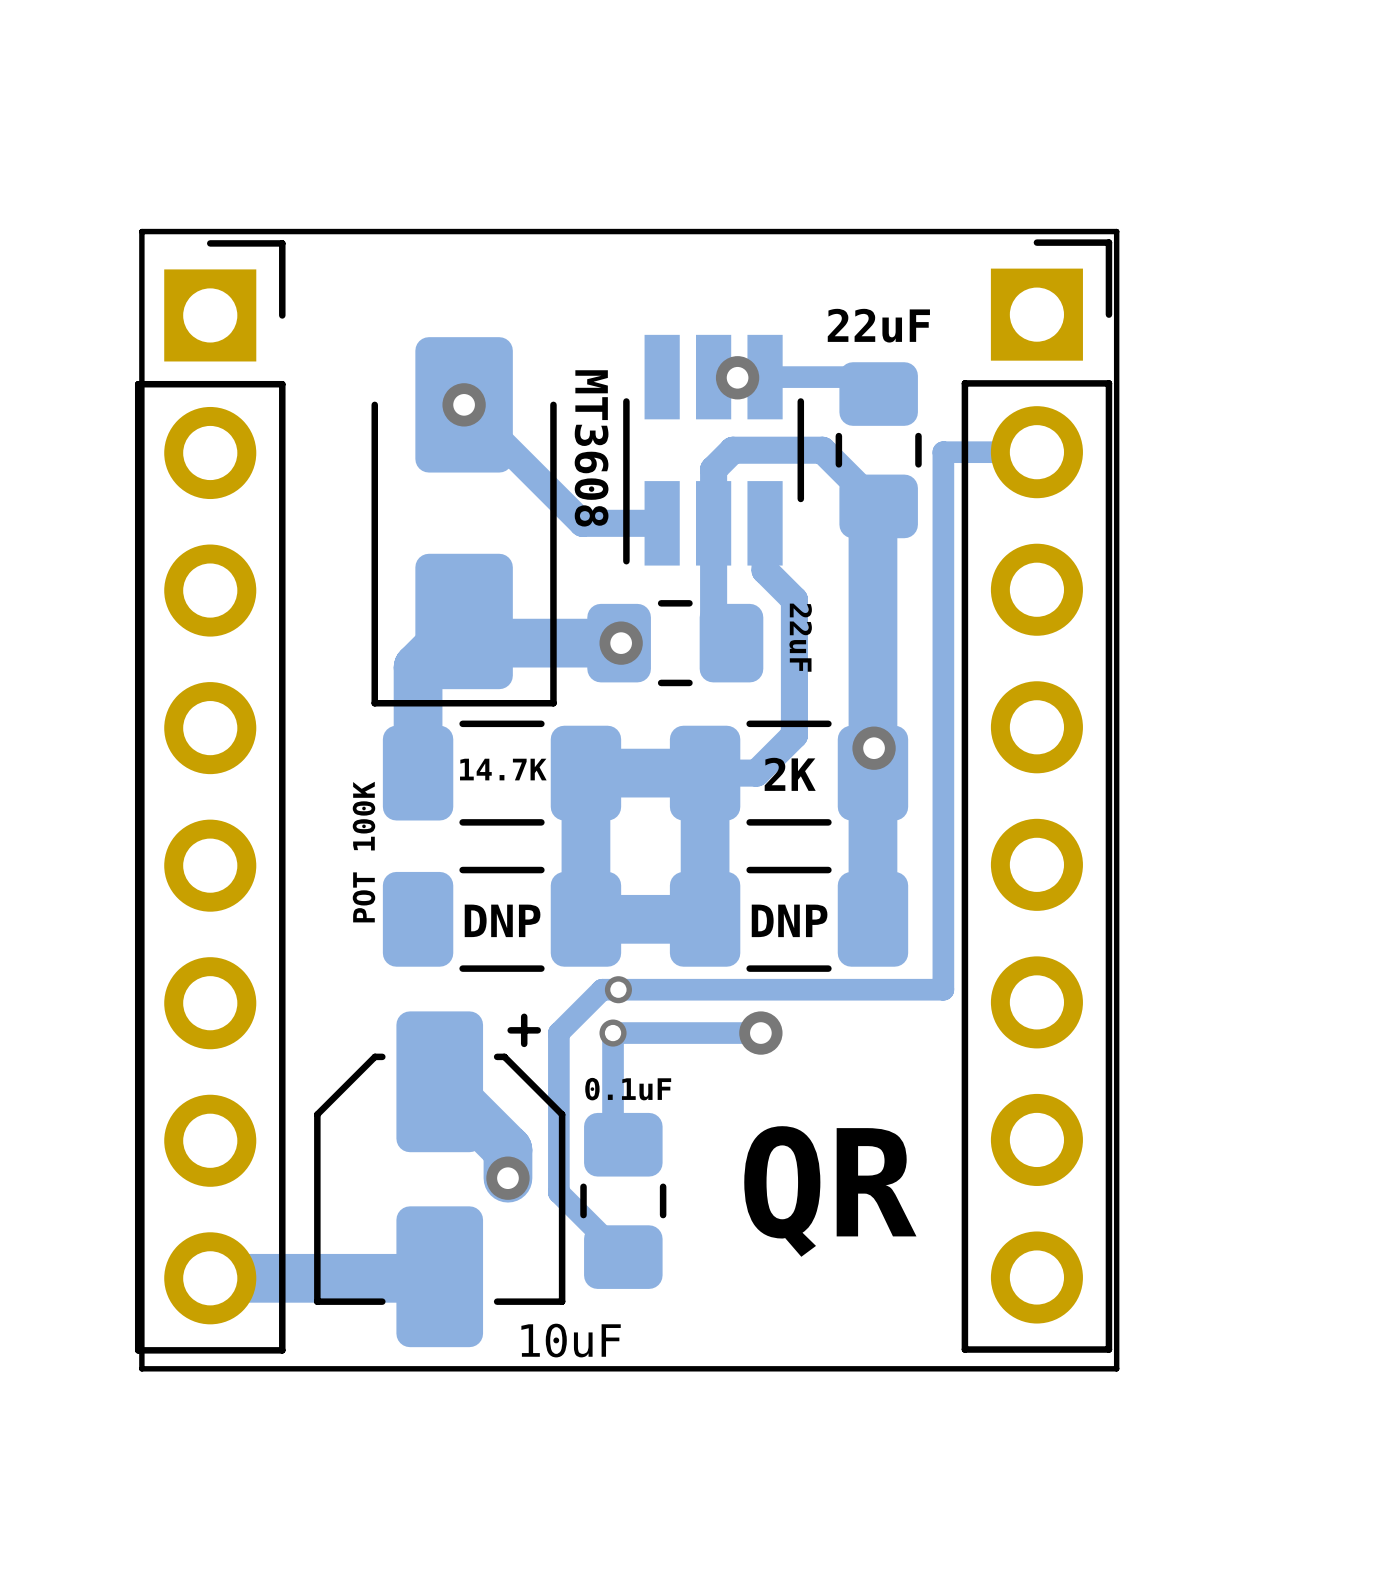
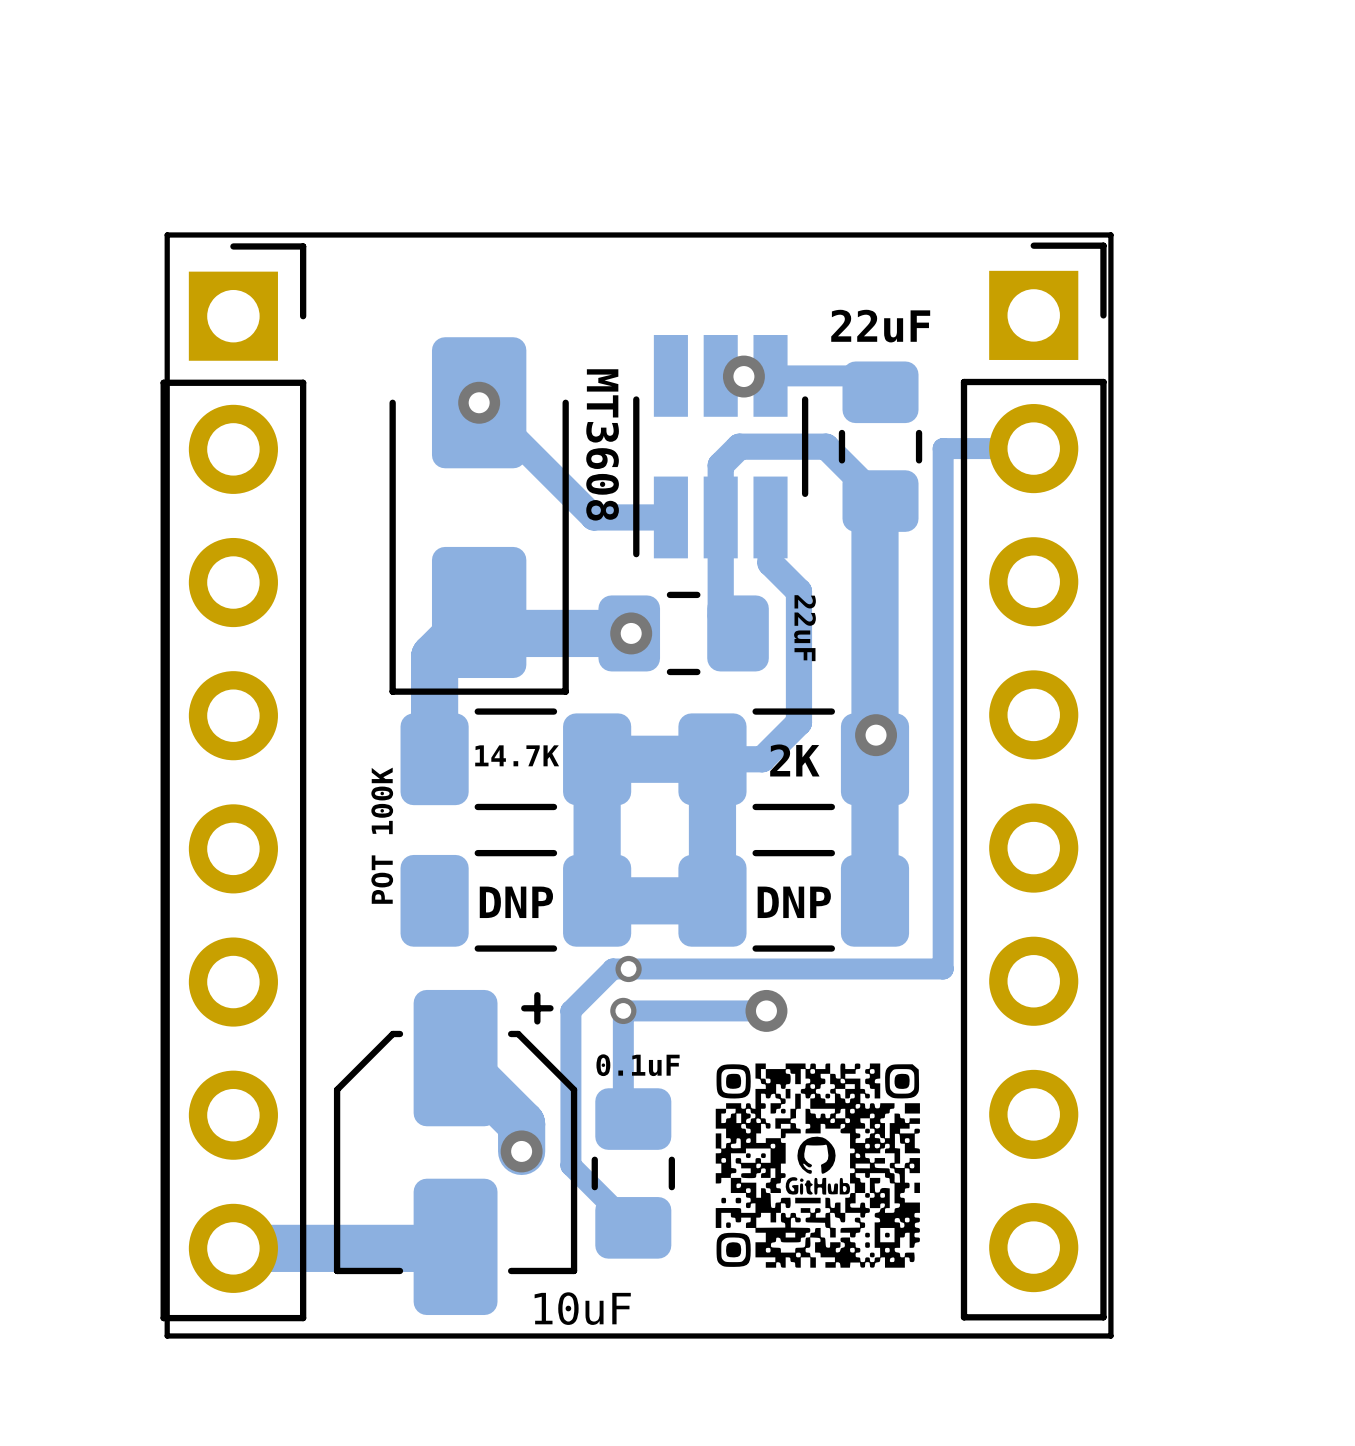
drawing: none -> [715, 1063, 920, 1268]
text: QR (830, 1191) -> none

